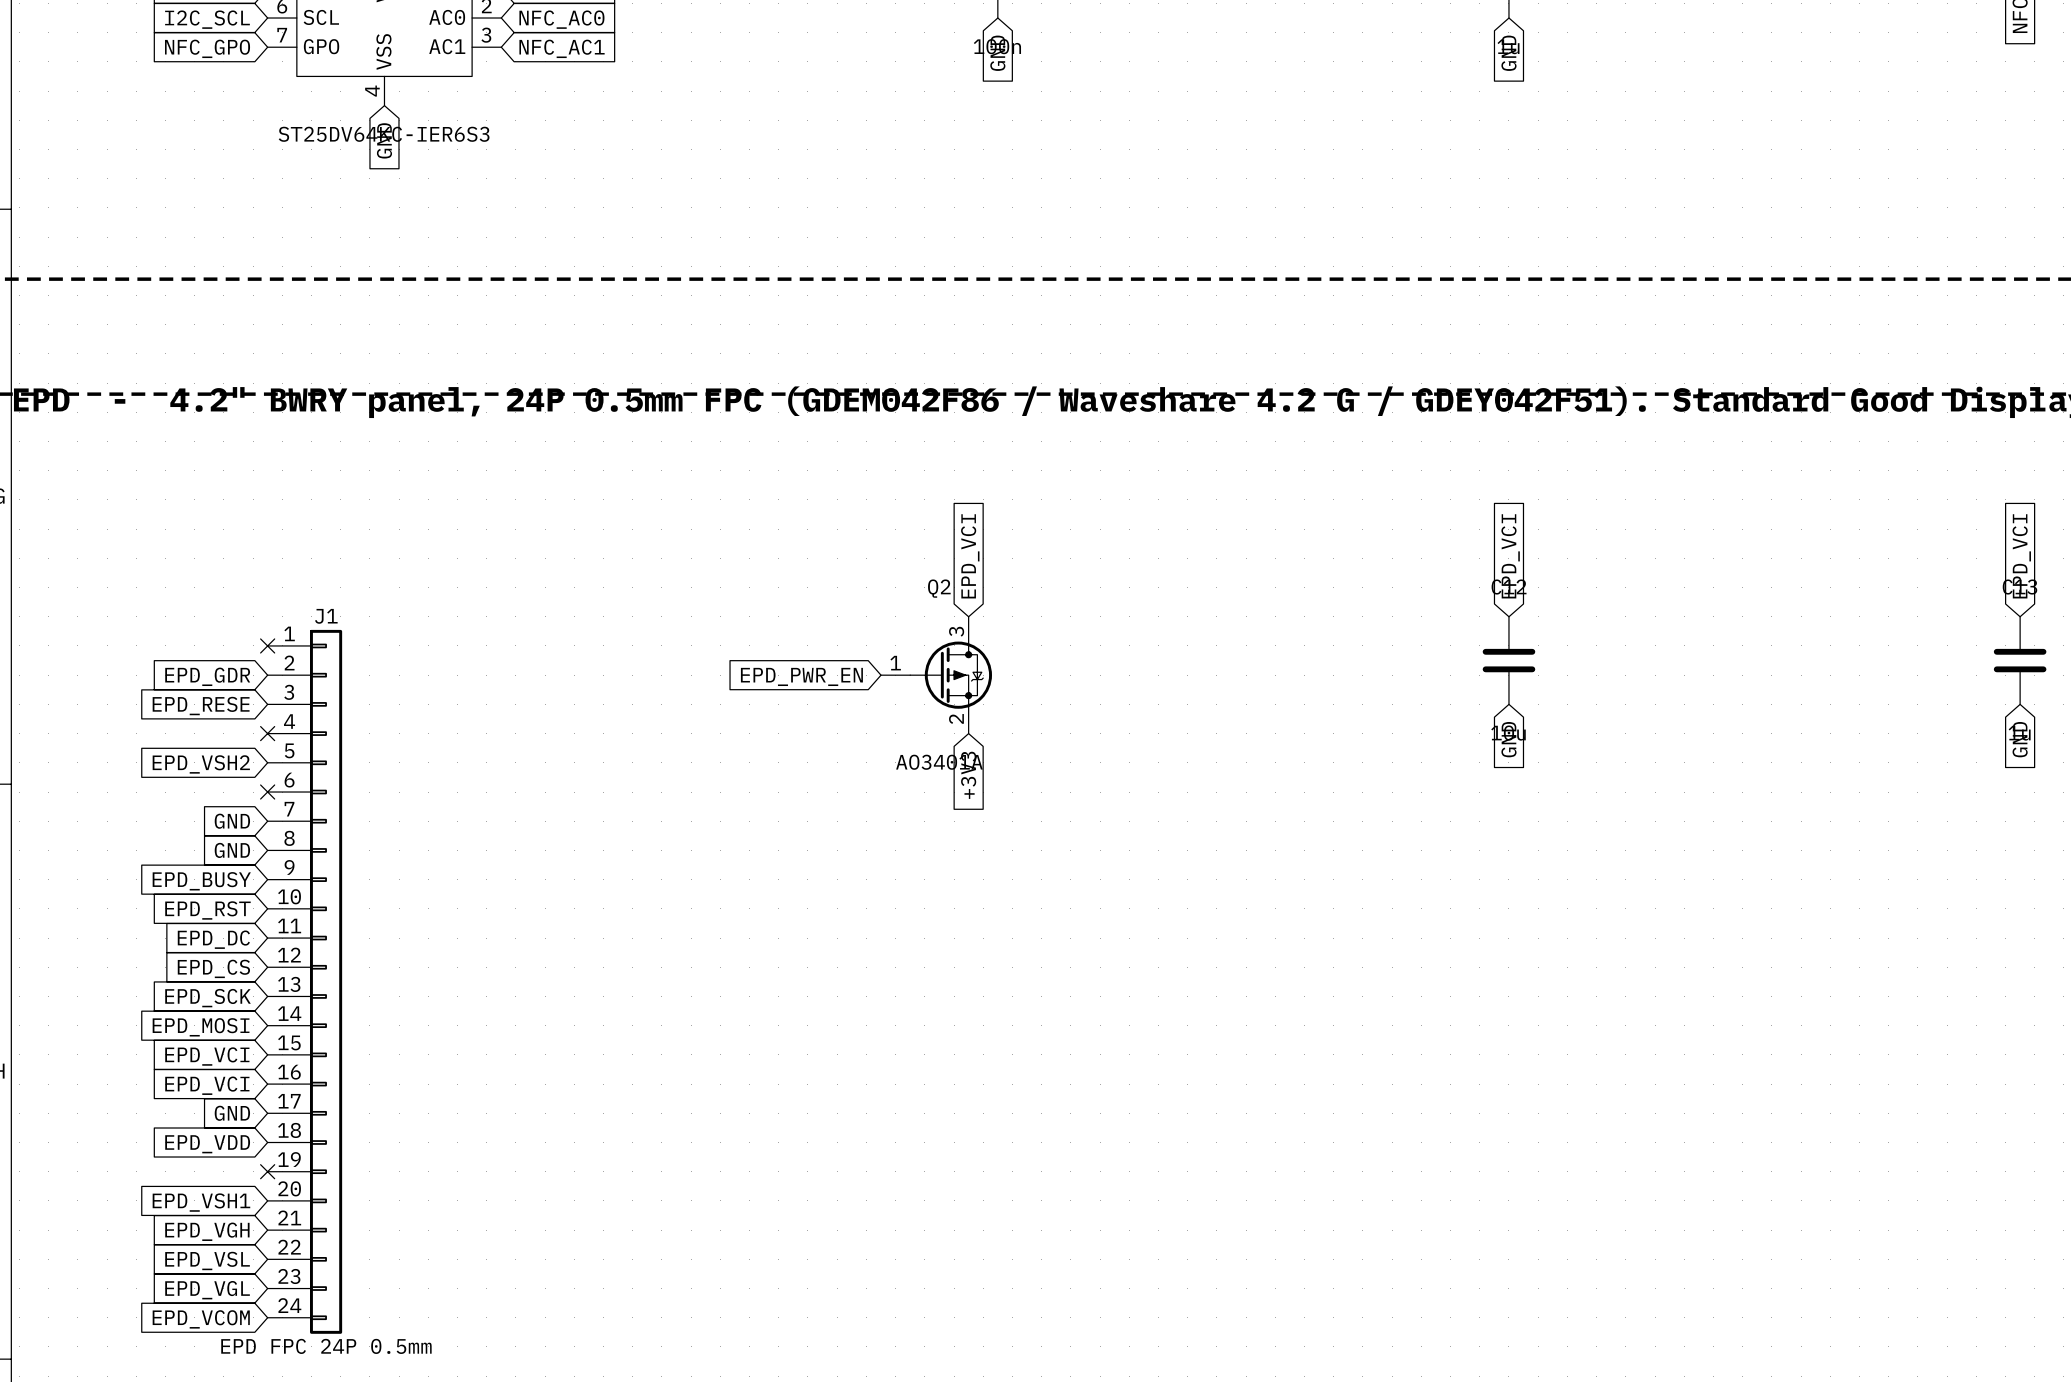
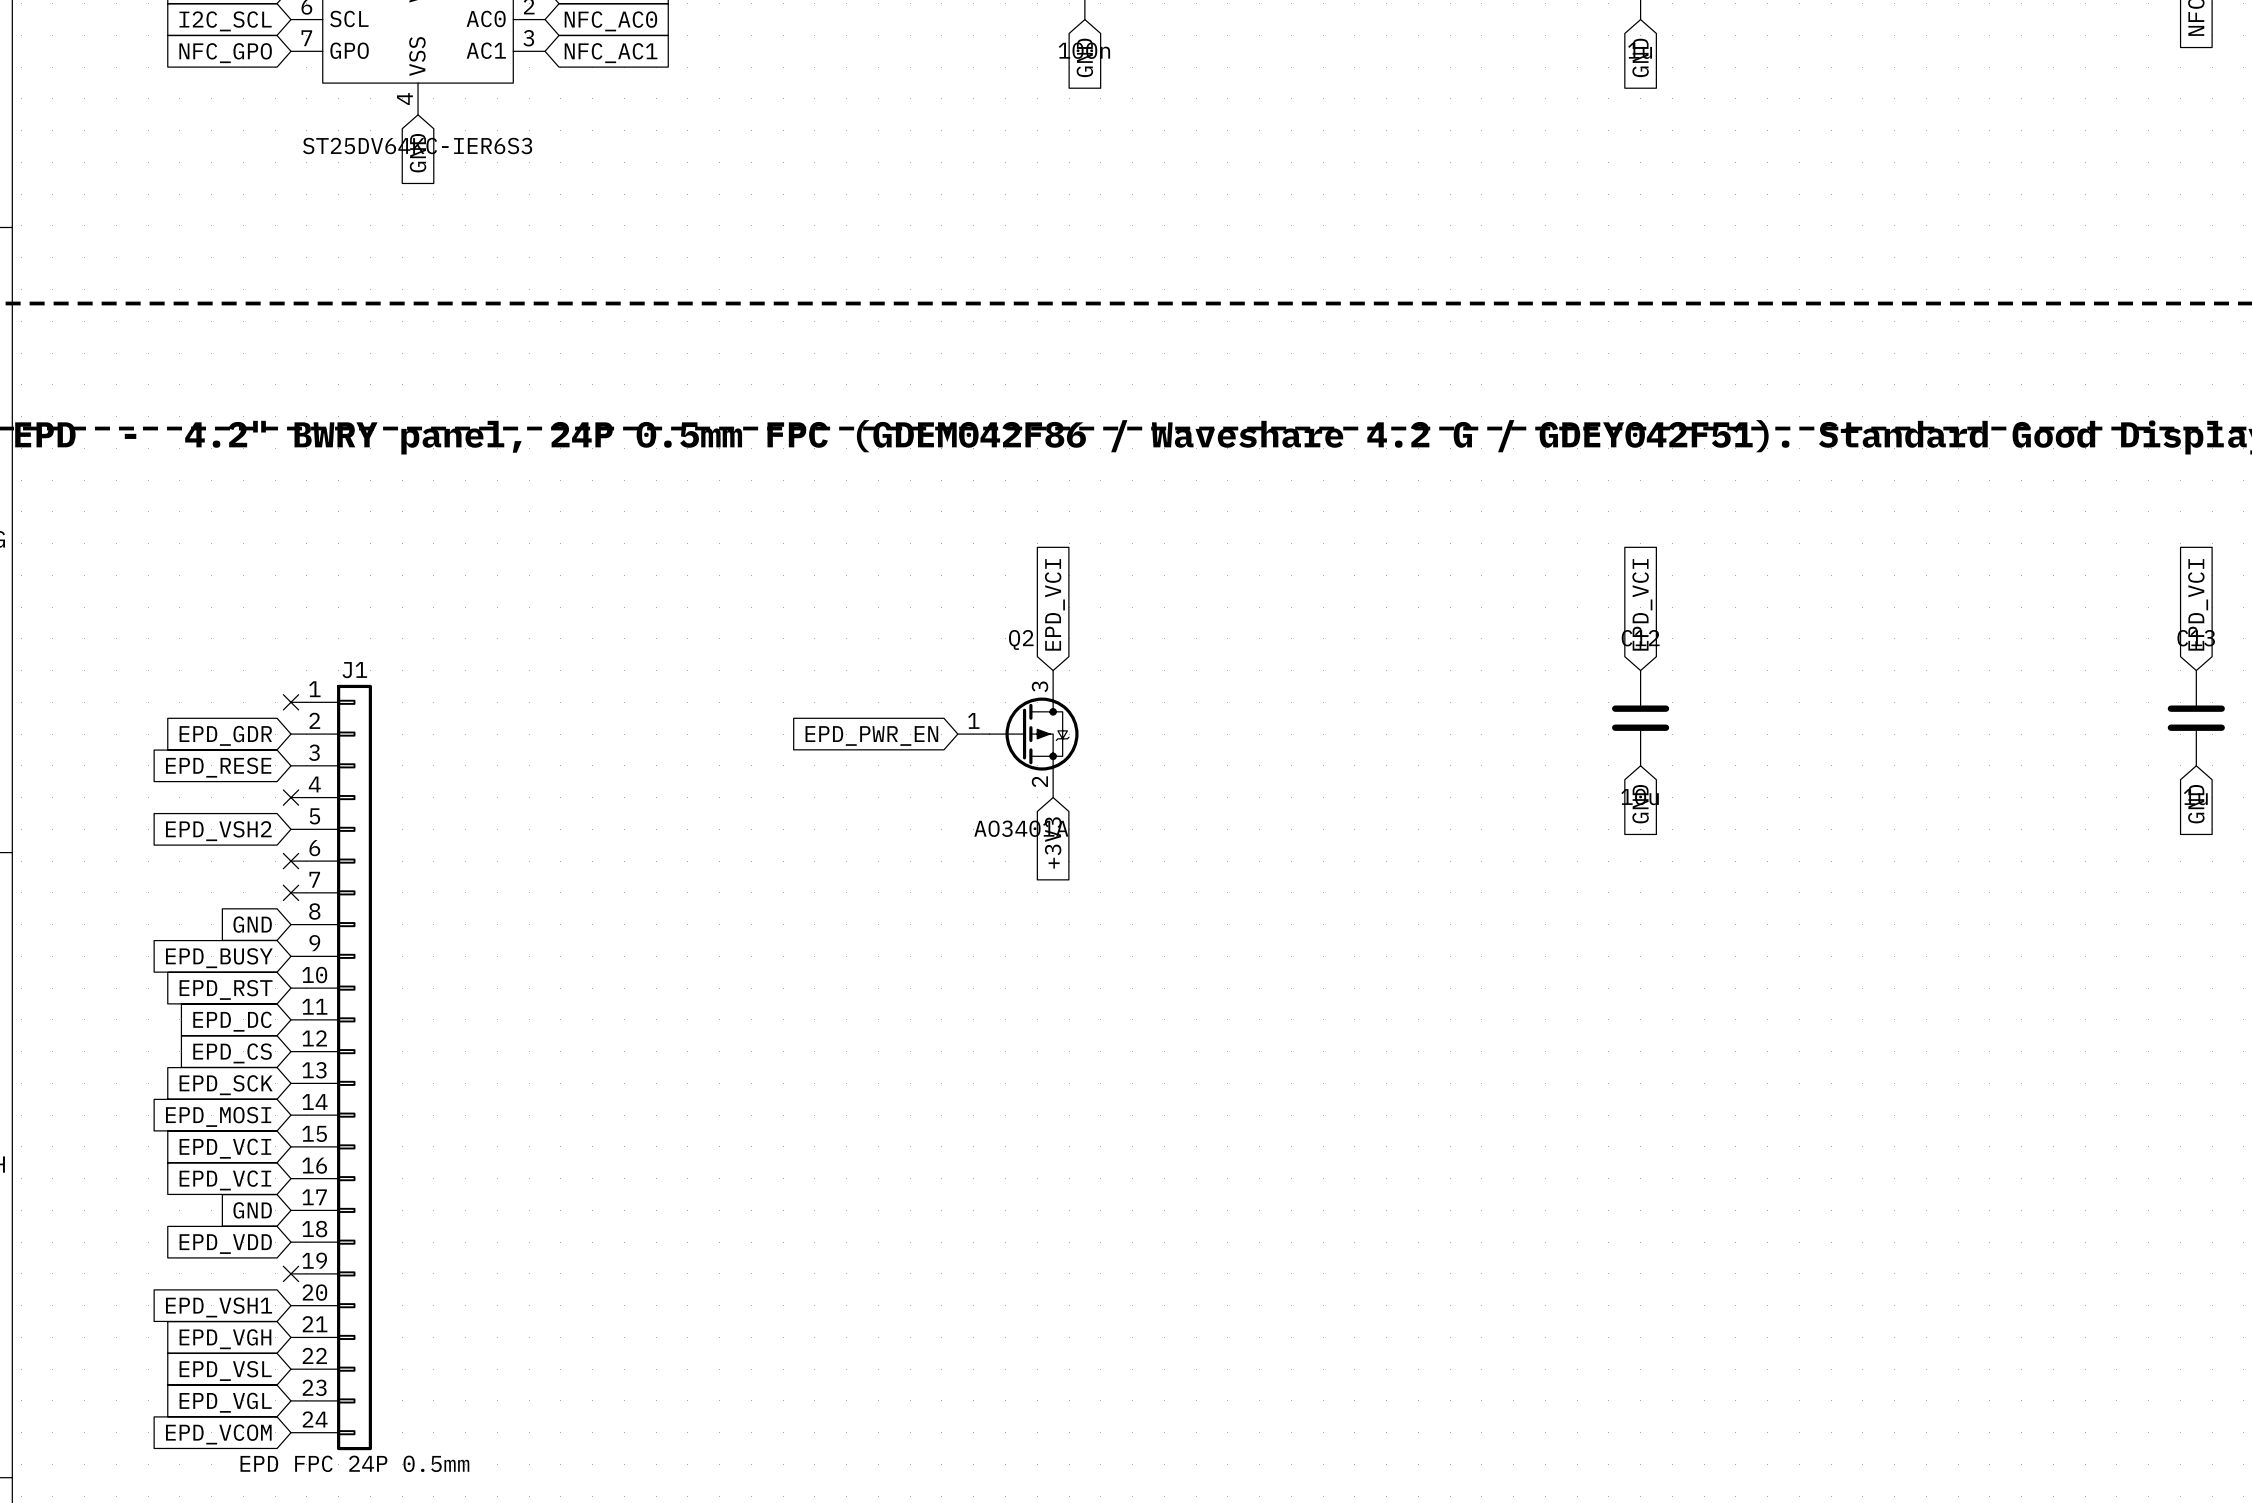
global label: GND (232, 821) -> none
no-connect mark: none -> (290, 892)

